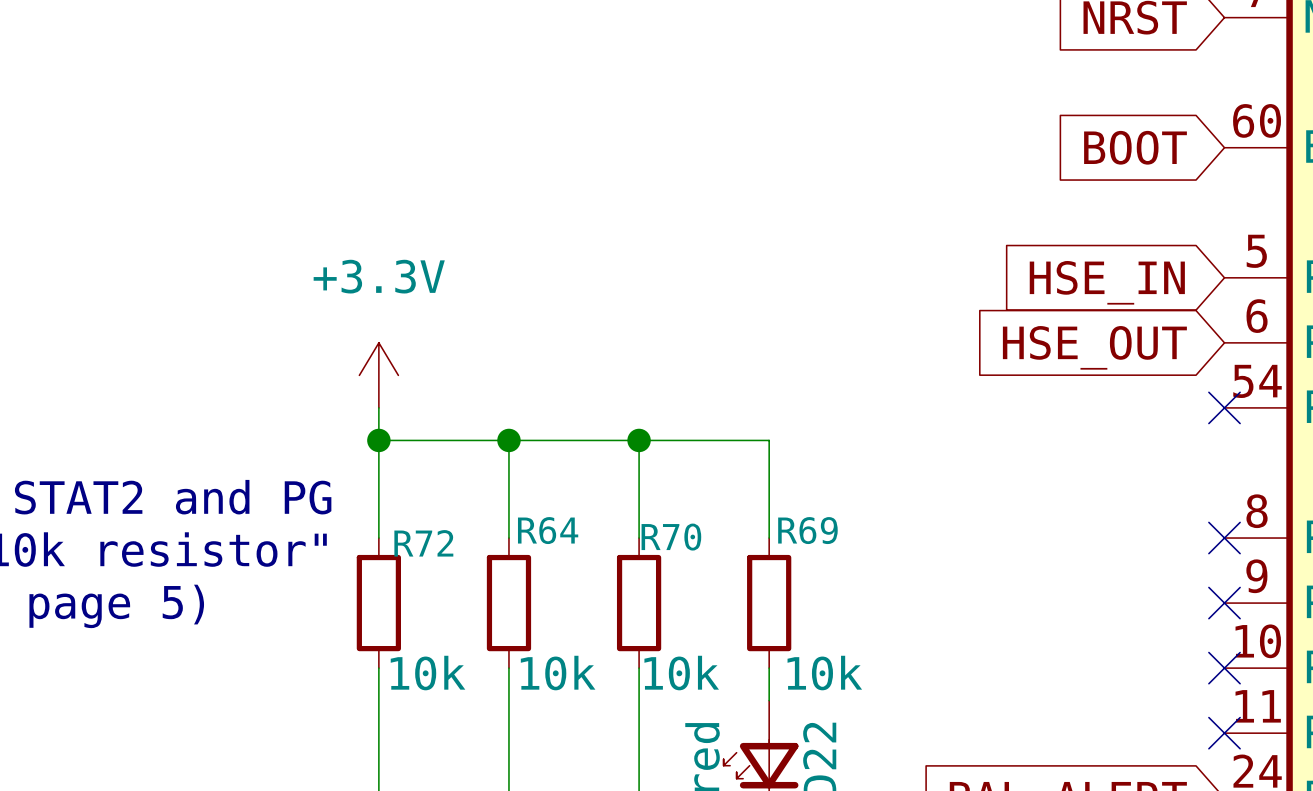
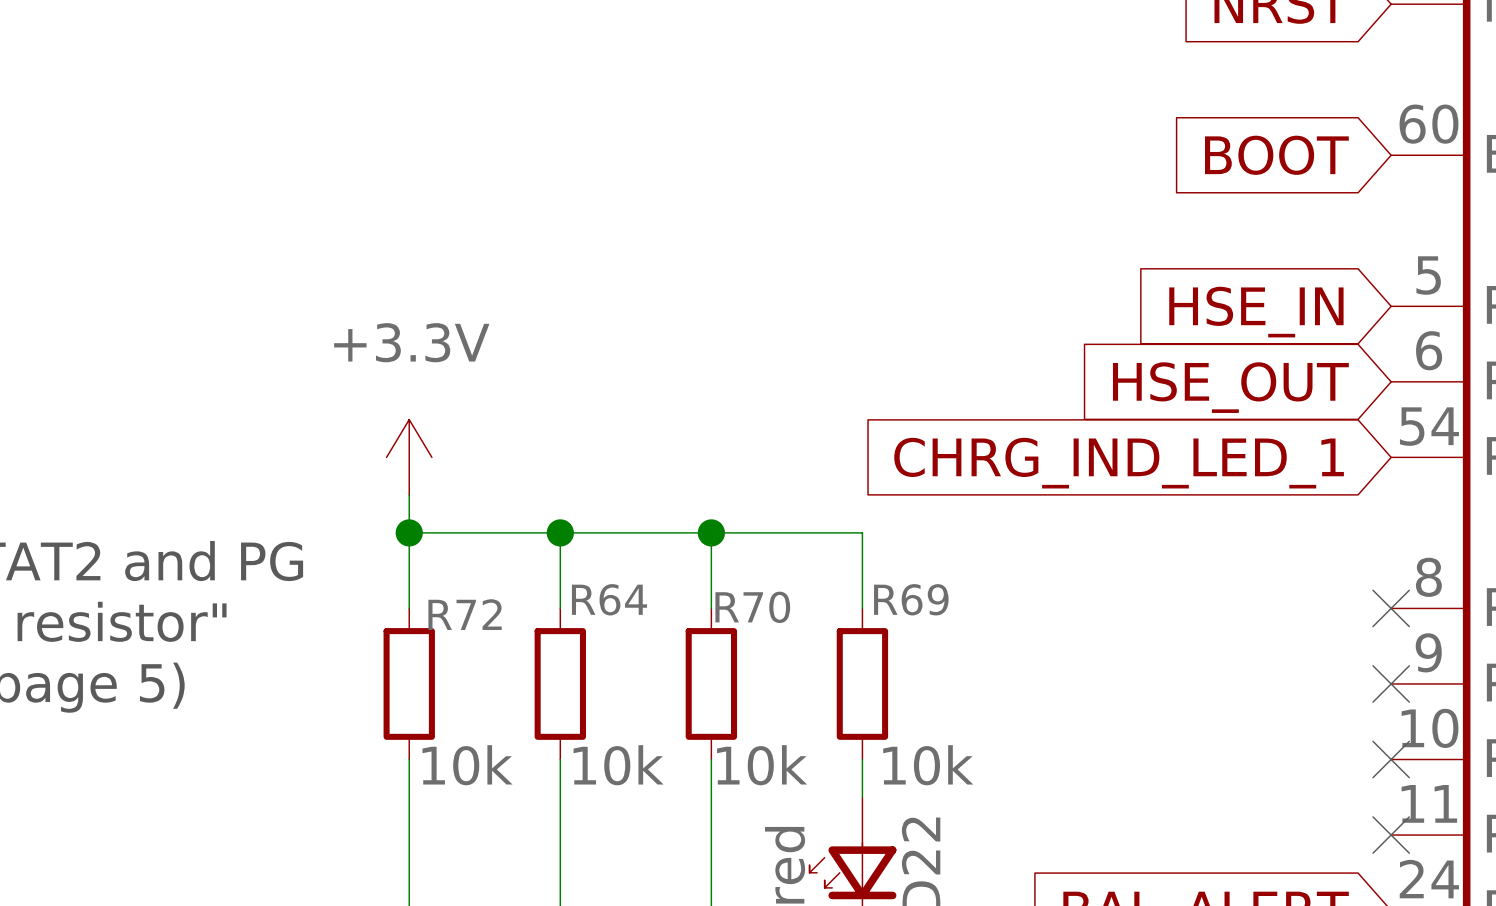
power symbol position: +3.3V (378, 375) -> +3.3V (409, 457)
wire: (378, 407) (378, 440) (769, 440) (769, 472) -> (409, 532) (862, 532)
no-connect mark: (1224, 407) -> none
global label: none -> CHRG_IND_LED_1 (1119, 463)
junction position: (378, 440) -> (409, 532)
wire: (508, 440) (508, 472) -> none
junction position: (508, 440) -> (560, 532)
wire: (639, 440) (639, 472) -> none
junction position: (639, 440) -> (711, 532)

